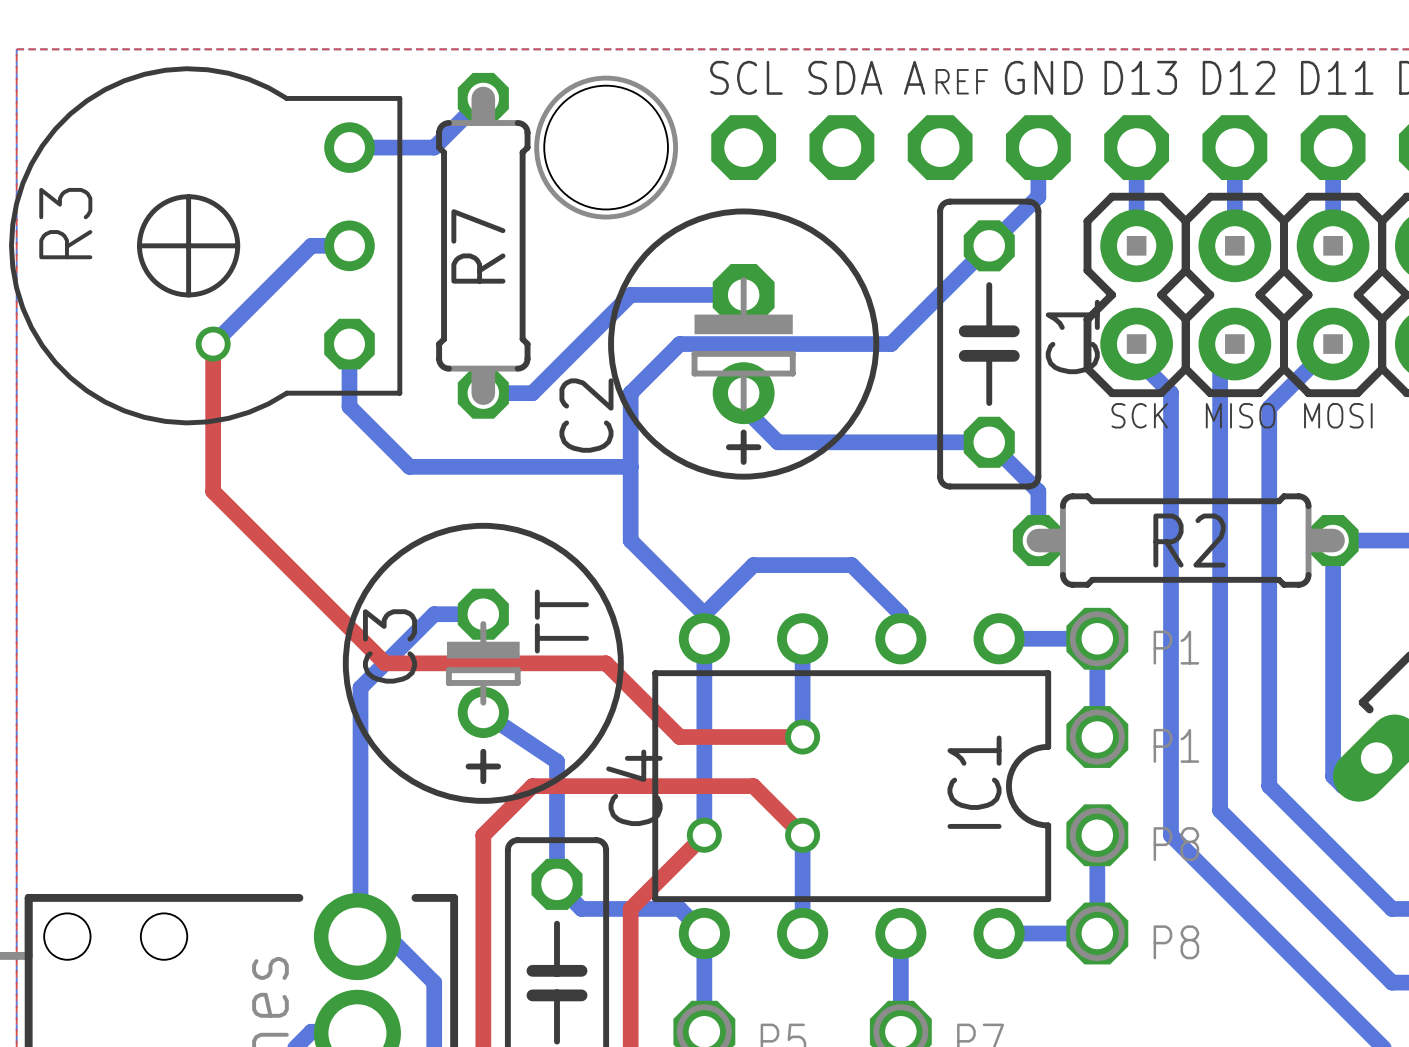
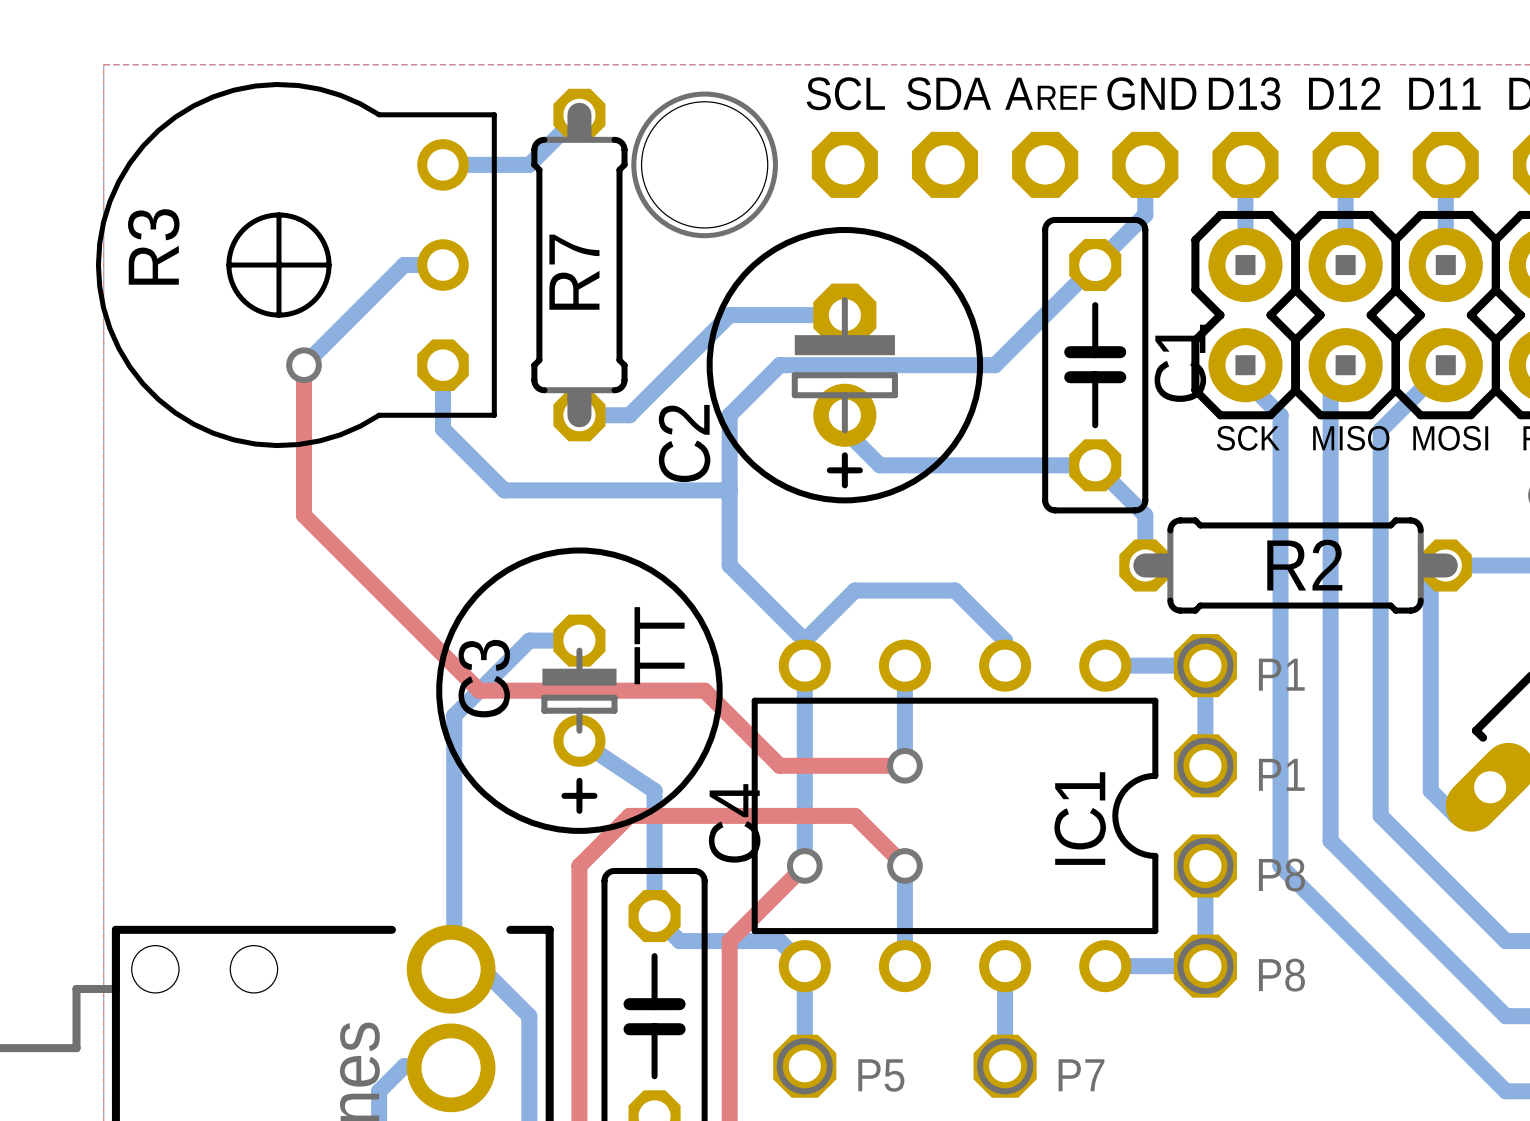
bottom track: (1333, 540) (1333, 776) -> (1445, 565) (1430, 580) (1430, 790) (1445, 805)

